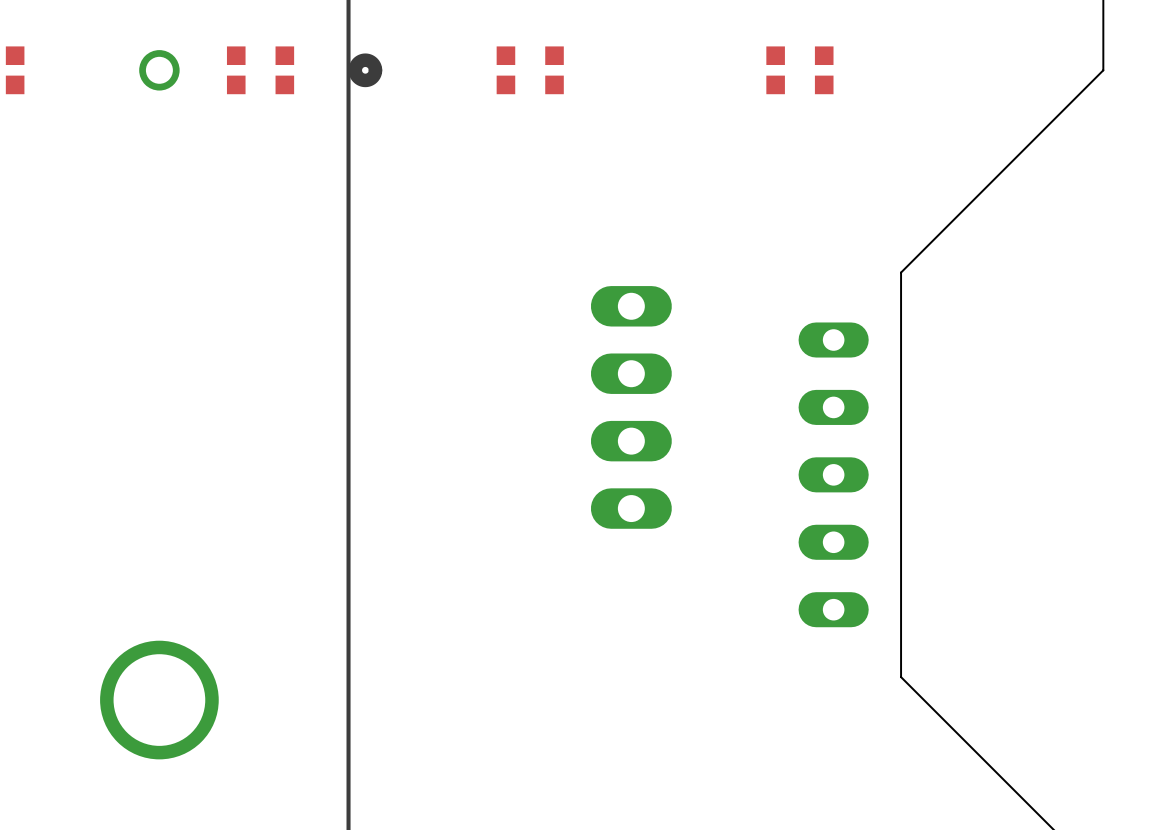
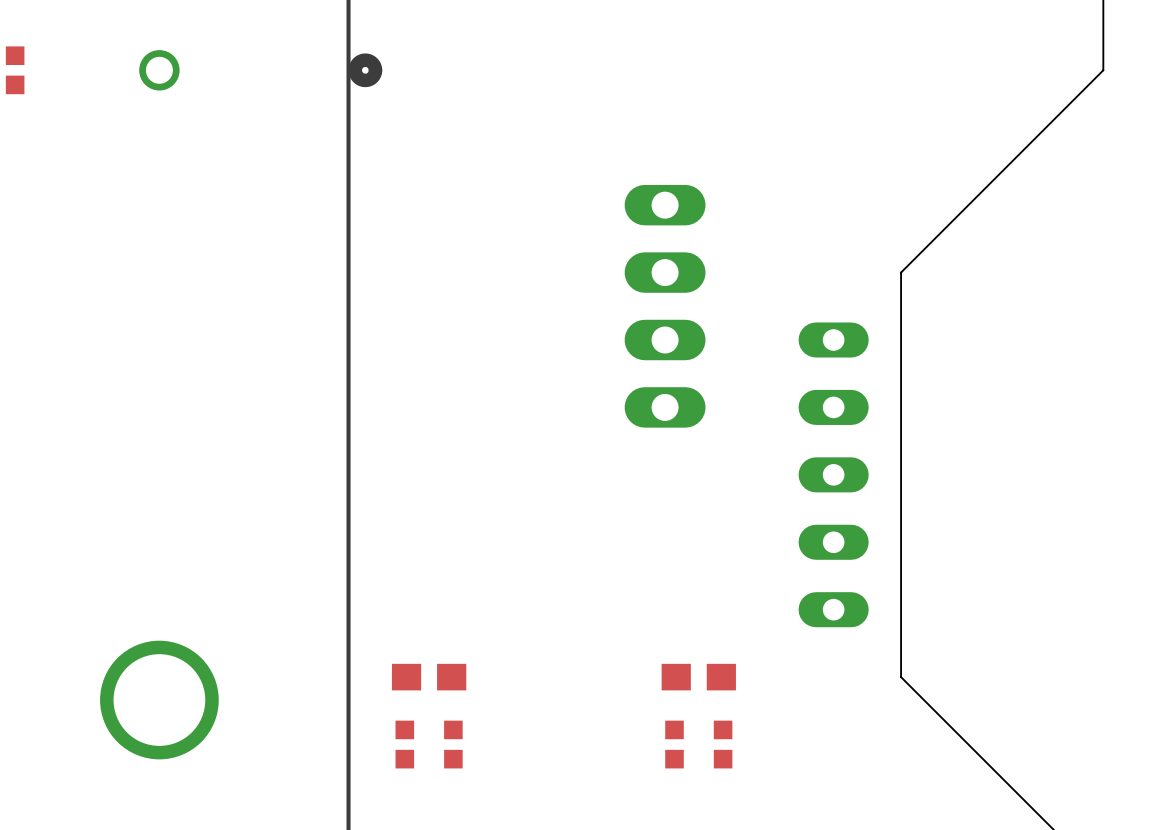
part: (260, 70) -> none
part: (530, 70) -> none
part: (799, 70) -> none
part position: (631, 407) -> (665, 306)
part: none -> (429, 677)
part: none -> (698, 677)
part: none -> (429, 744)
part: none -> (698, 744)

